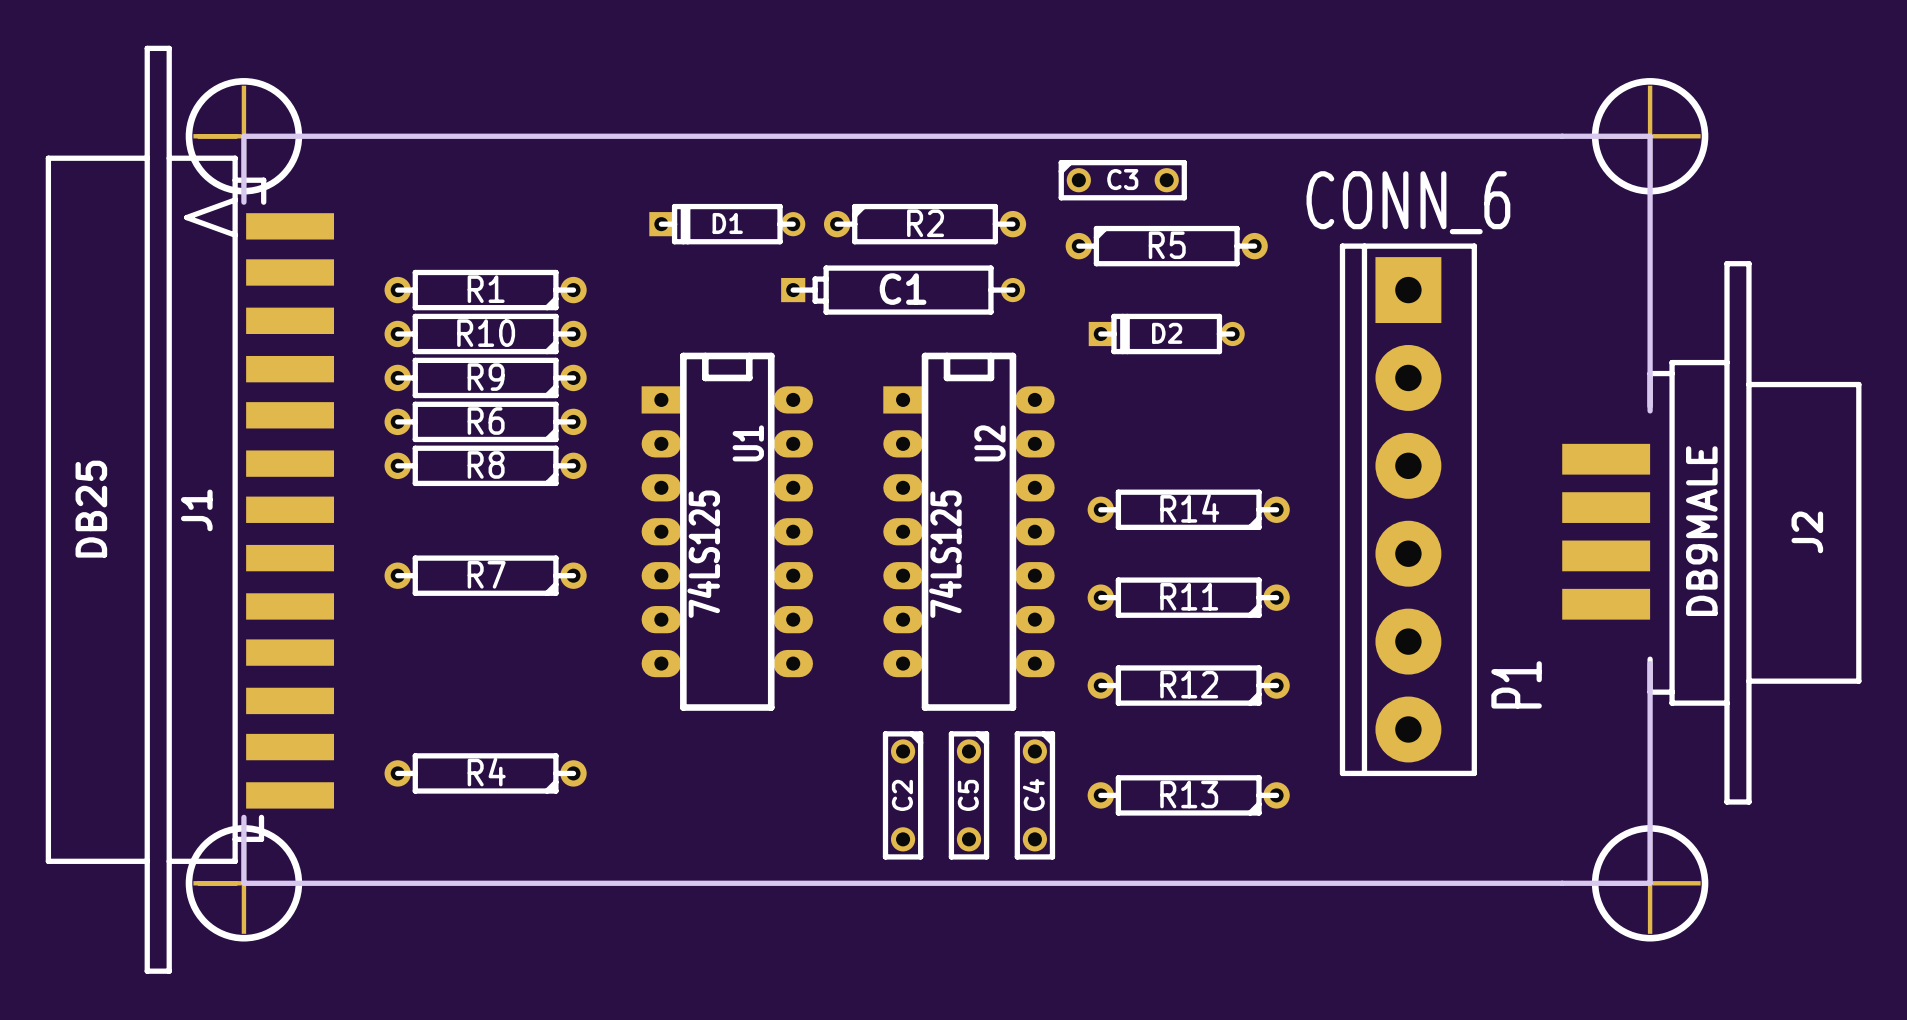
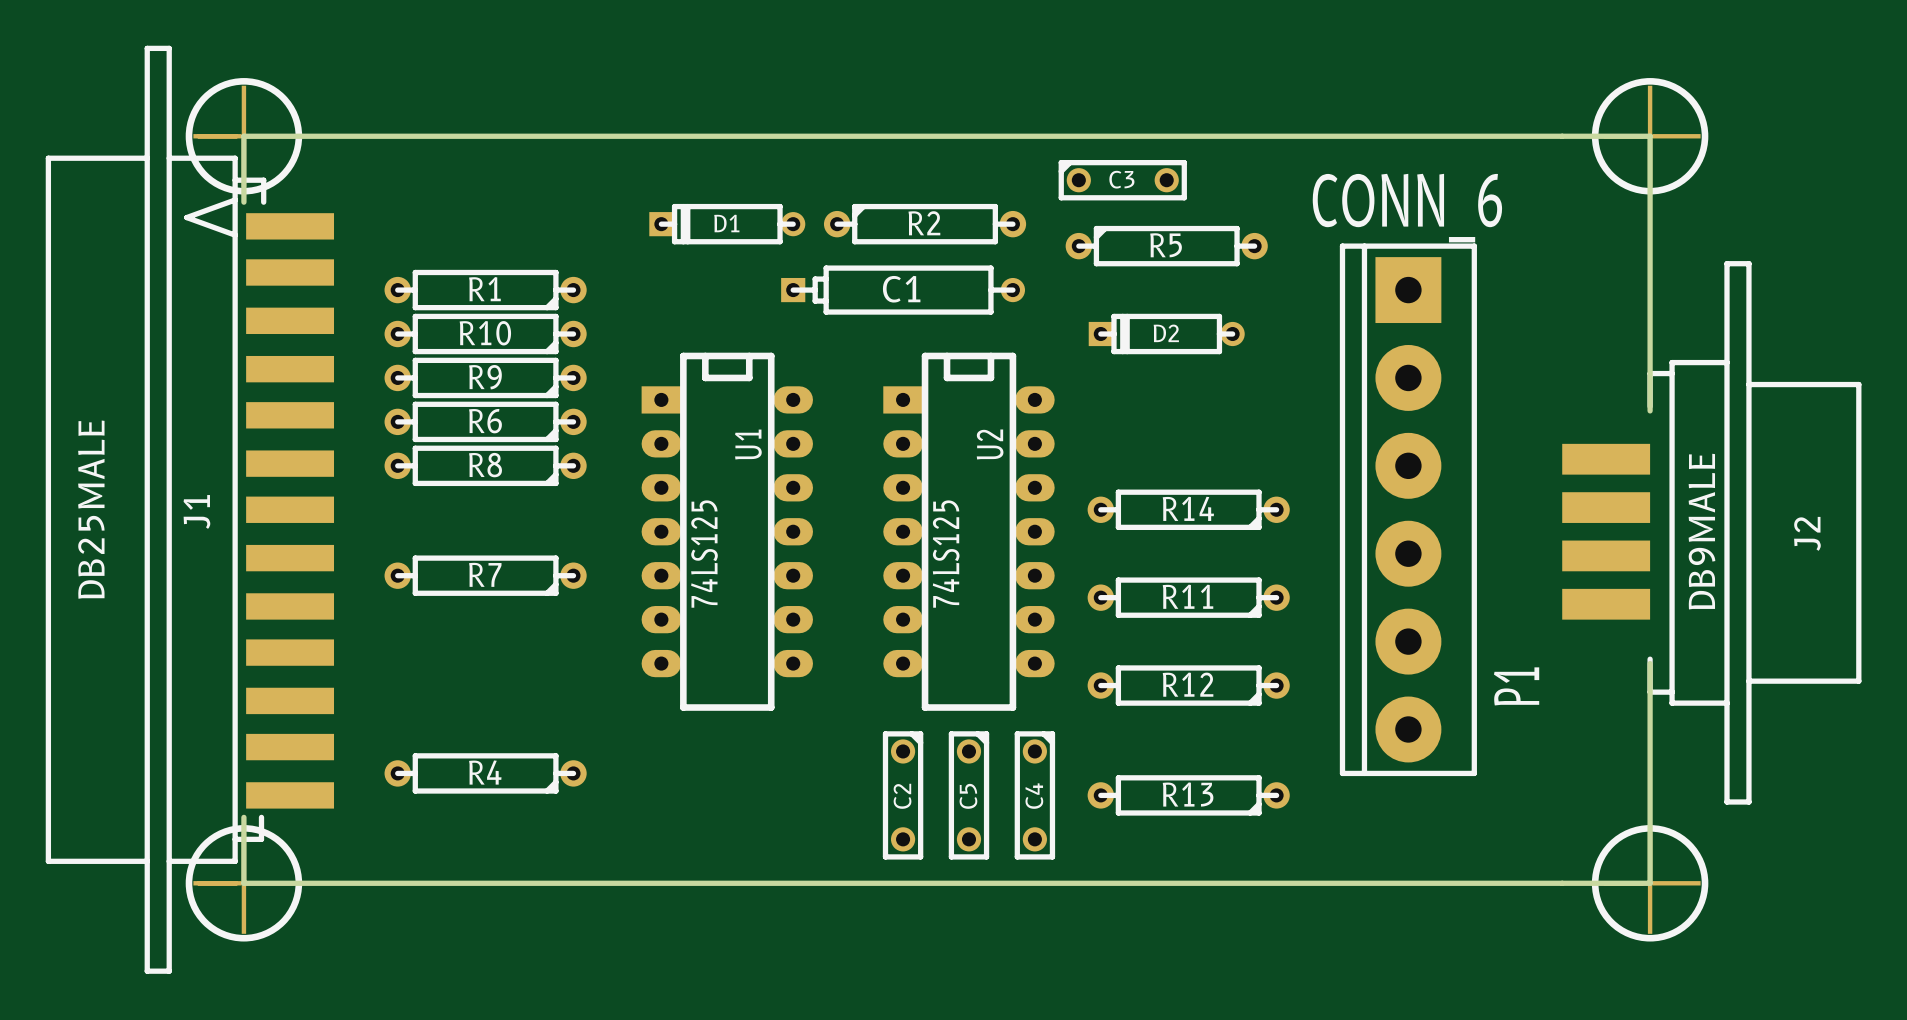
J1 value: DB25 (91, 509) -> DB25MALE (91, 509)

